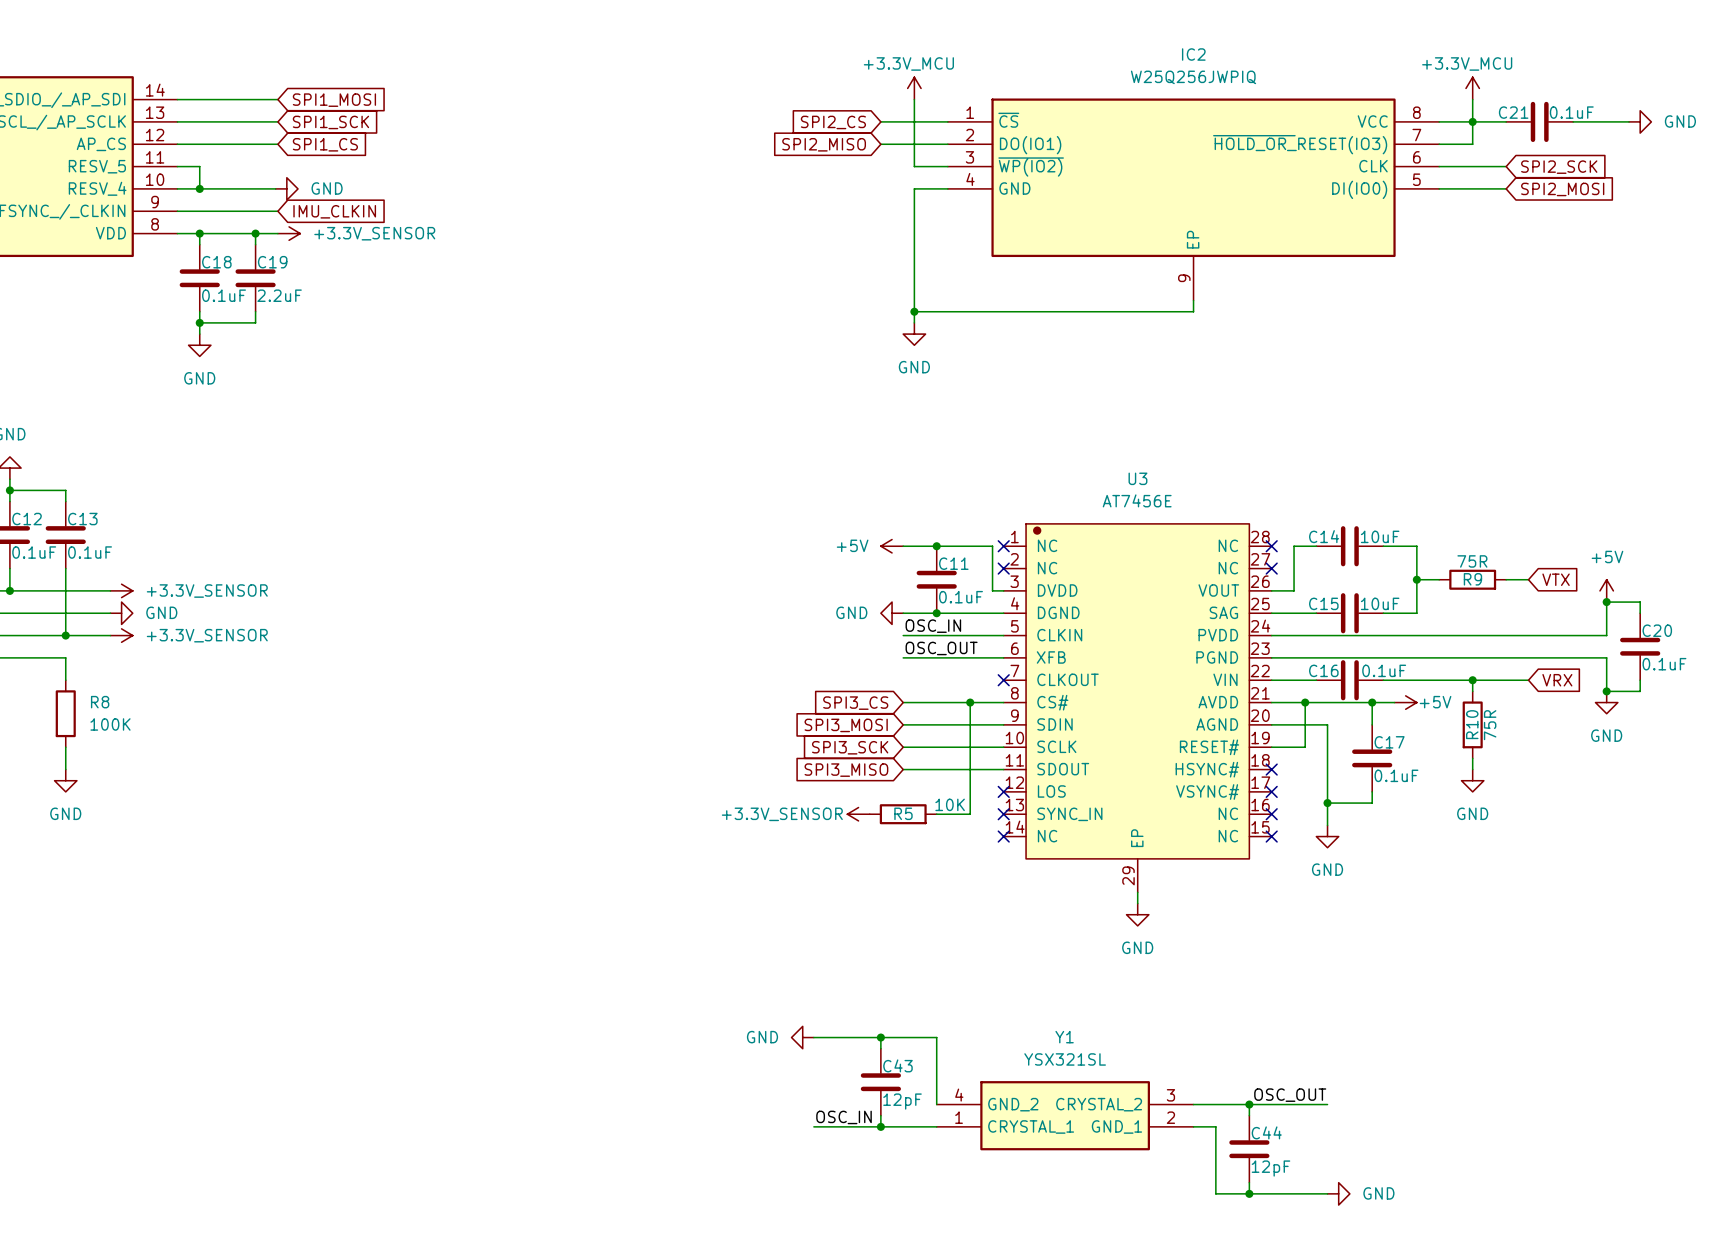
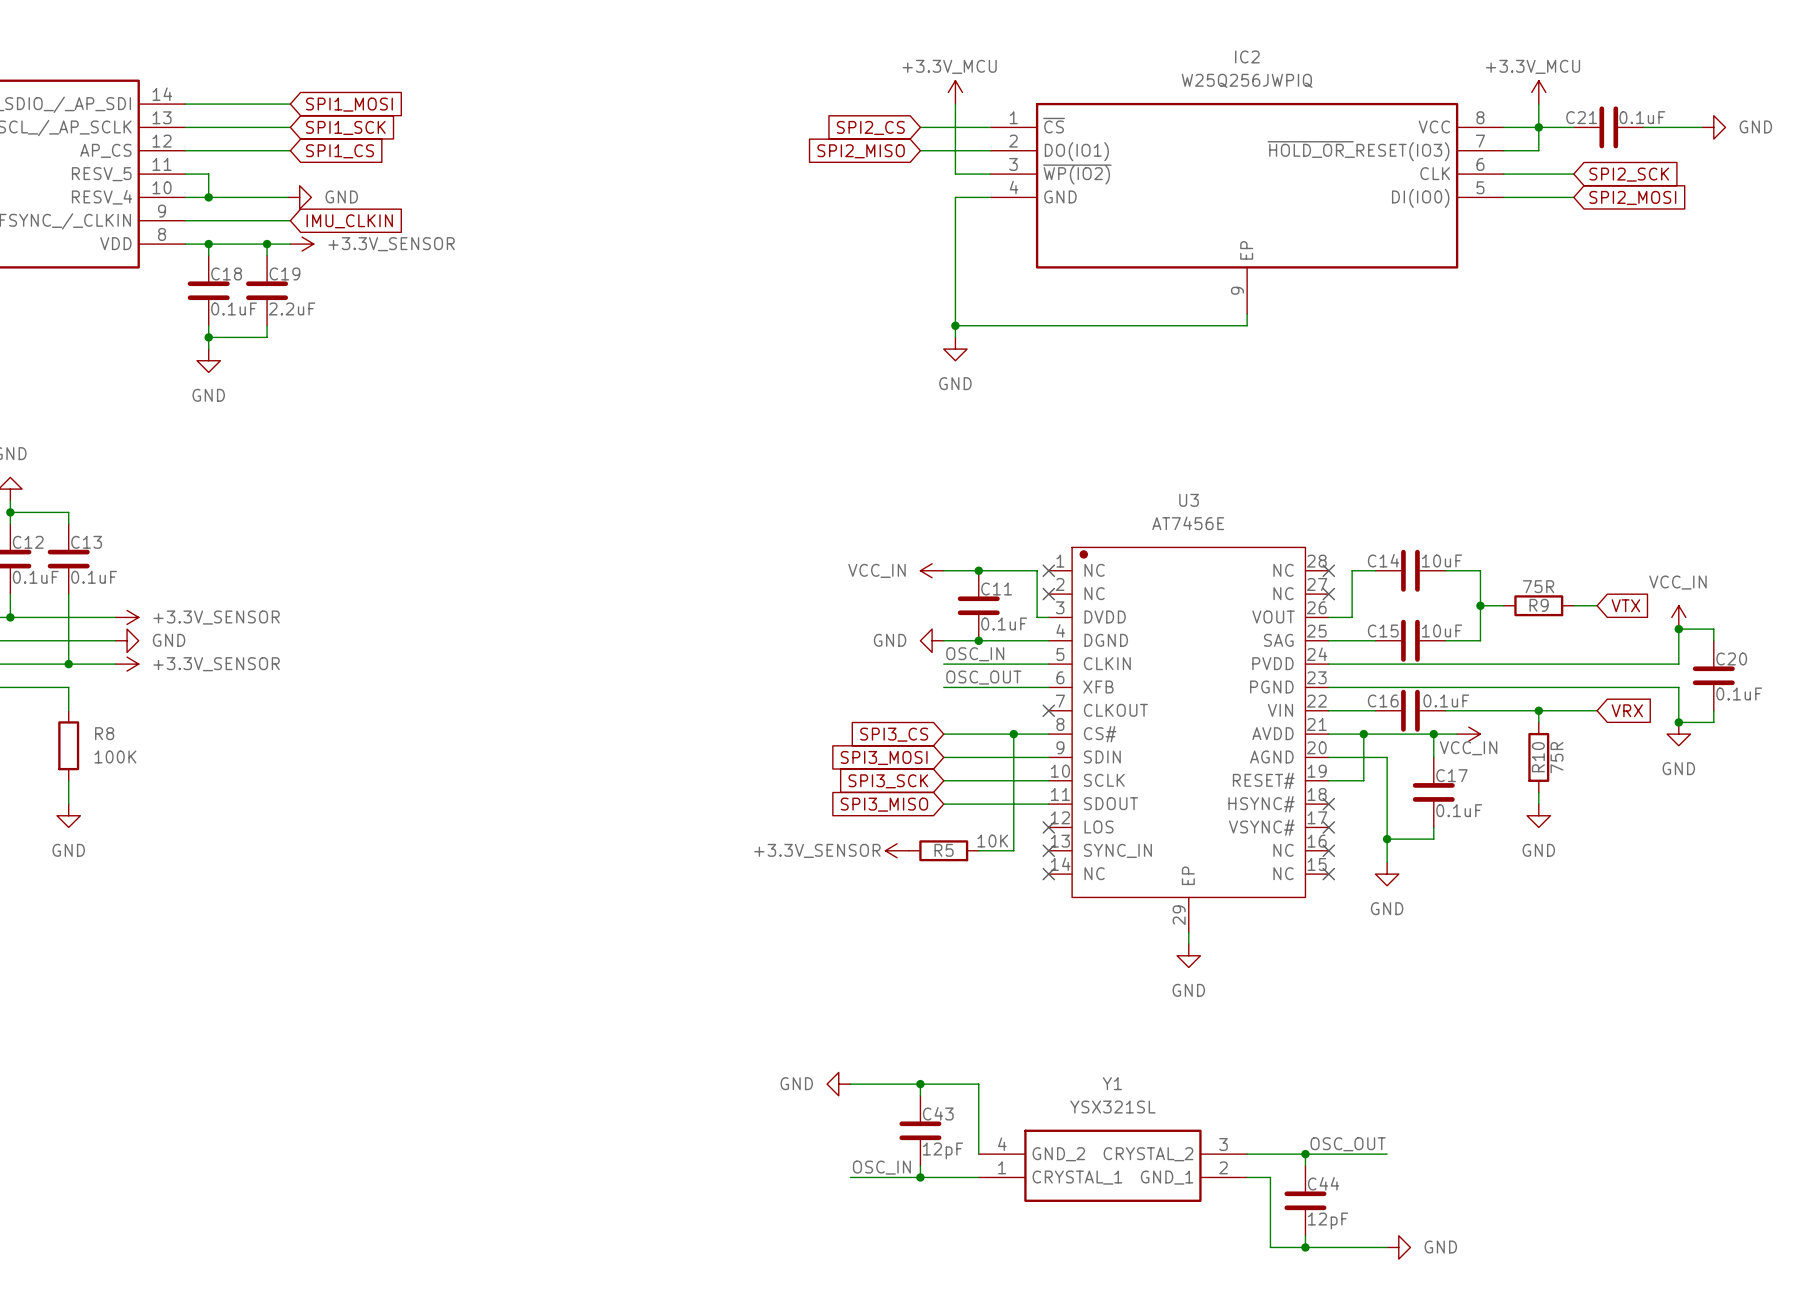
power symbol: +5V (892, 546) -> VCC_IN (932, 570)
power symbol: +5V (1606, 590) -> VCC_IN (1678, 617)
power symbol: +5V (1405, 702) -> VCC_IN (1468, 734)

